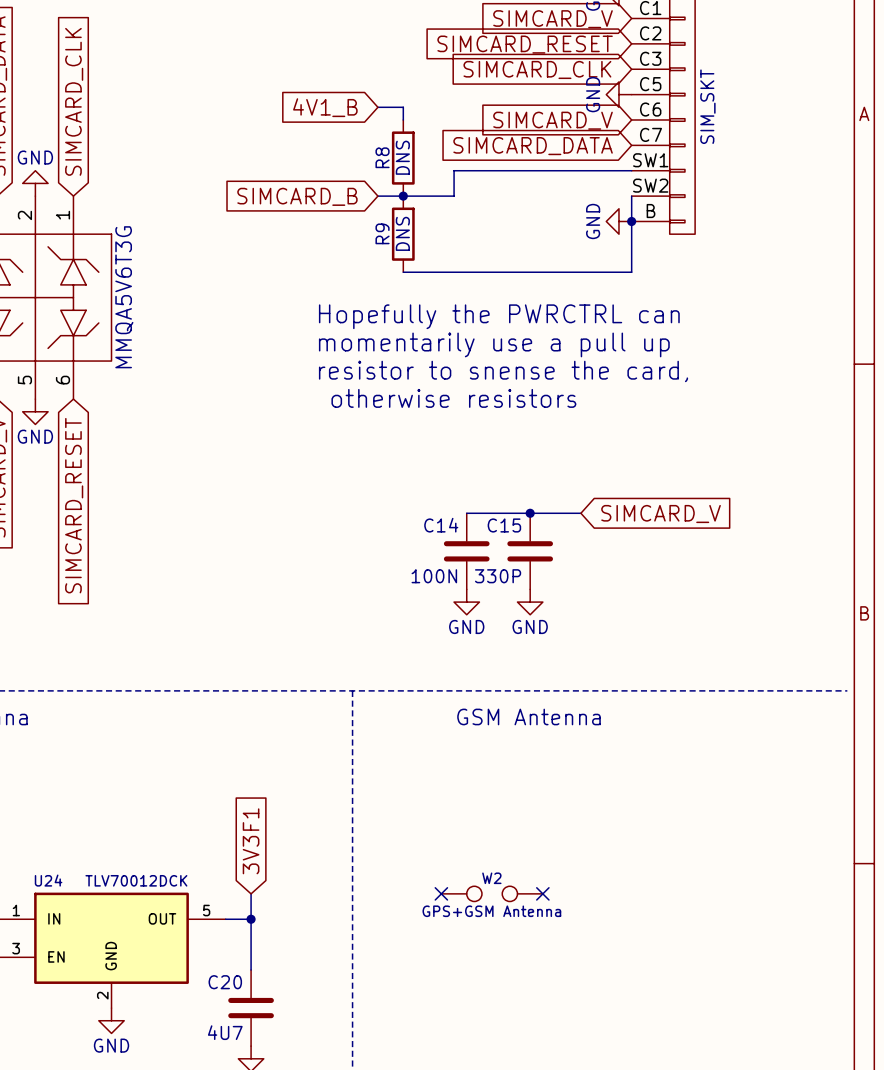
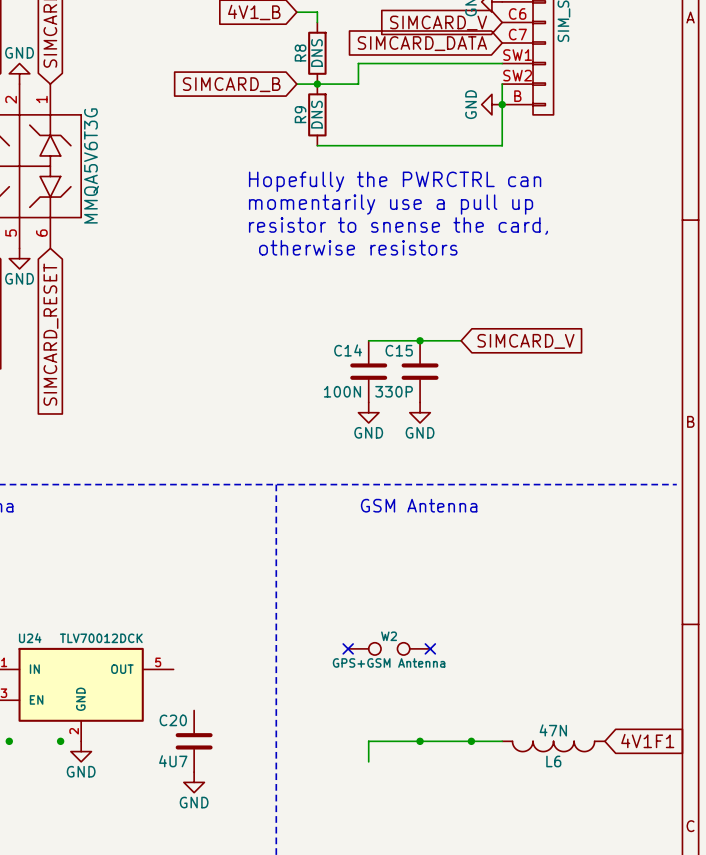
global label: 3V3F1 (251, 841) -> none
wire: (251, 893) (251, 970) -> none
wire: (225, 919) (251, 919) -> none
junction: (251, 919) -> none
global label: none -> 4V1F1 (647, 741)
junction: none -> (9, 741)
junction: none -> (60, 741)
junction: none -> (420, 741)
junction: none -> (471, 741)
wire: none -> (502, 741) (368, 741) (368, 761)
L6: none -> 47N (553, 746)

